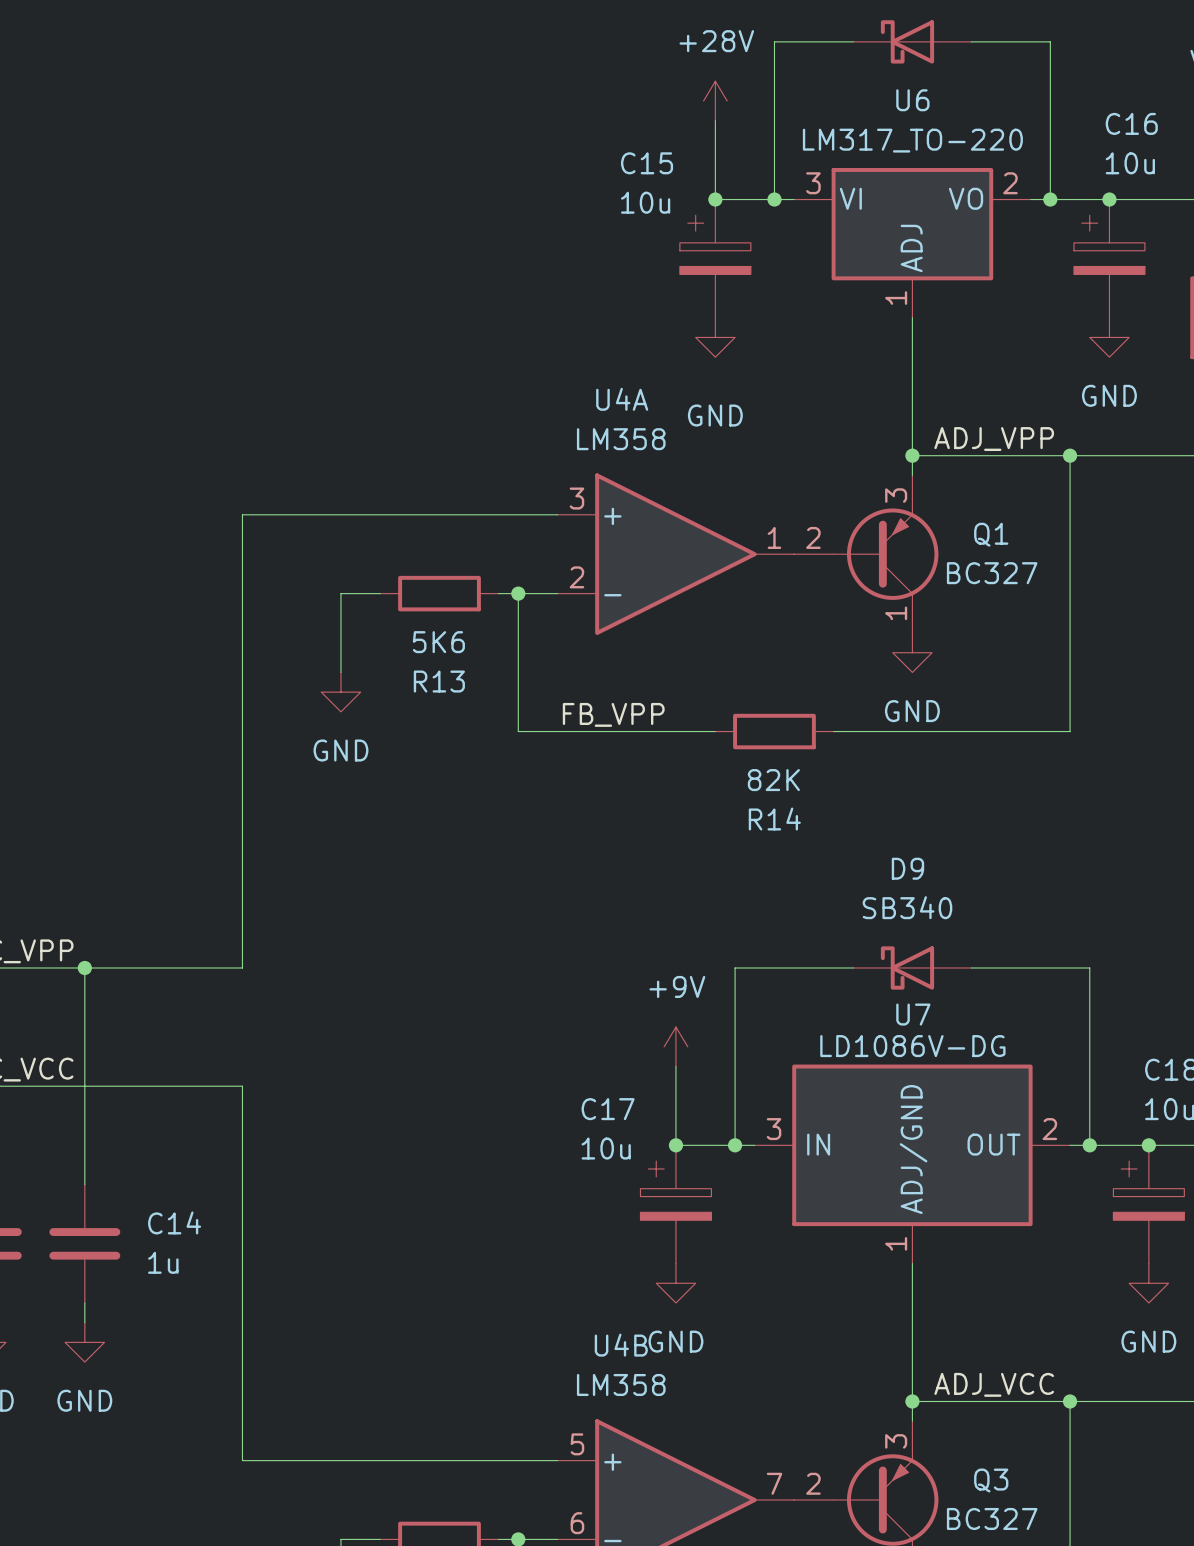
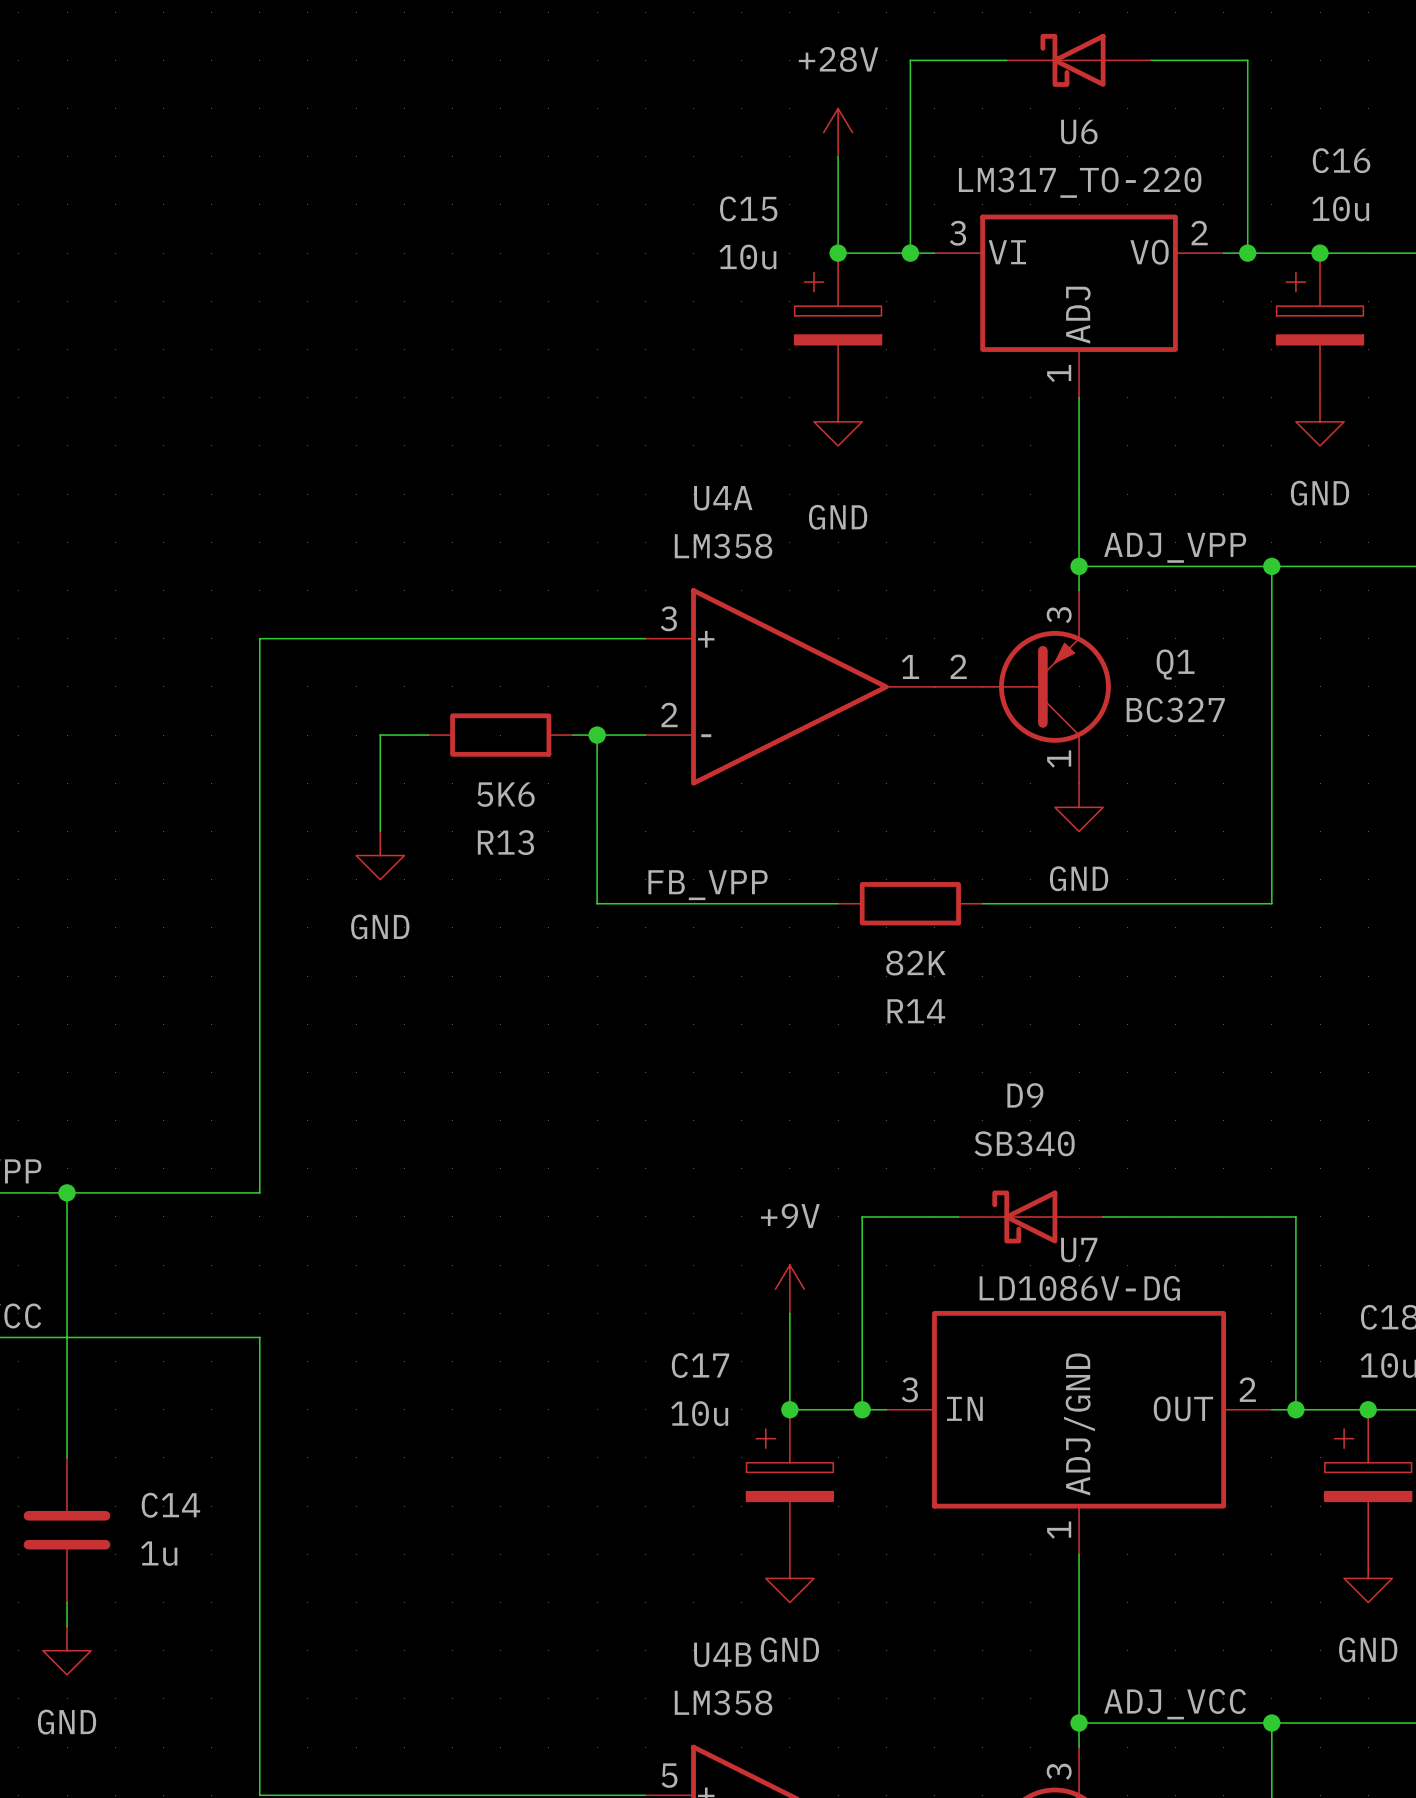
wire: (853, 967) (735, 967) (735, 987) -> (958, 1216) (862, 1216)
D9 position: (912, 967) -> (1030, 1216)
wire: (971, 967) (1089, 967) (1089, 987) -> (1103, 1216) (1295, 1216)

